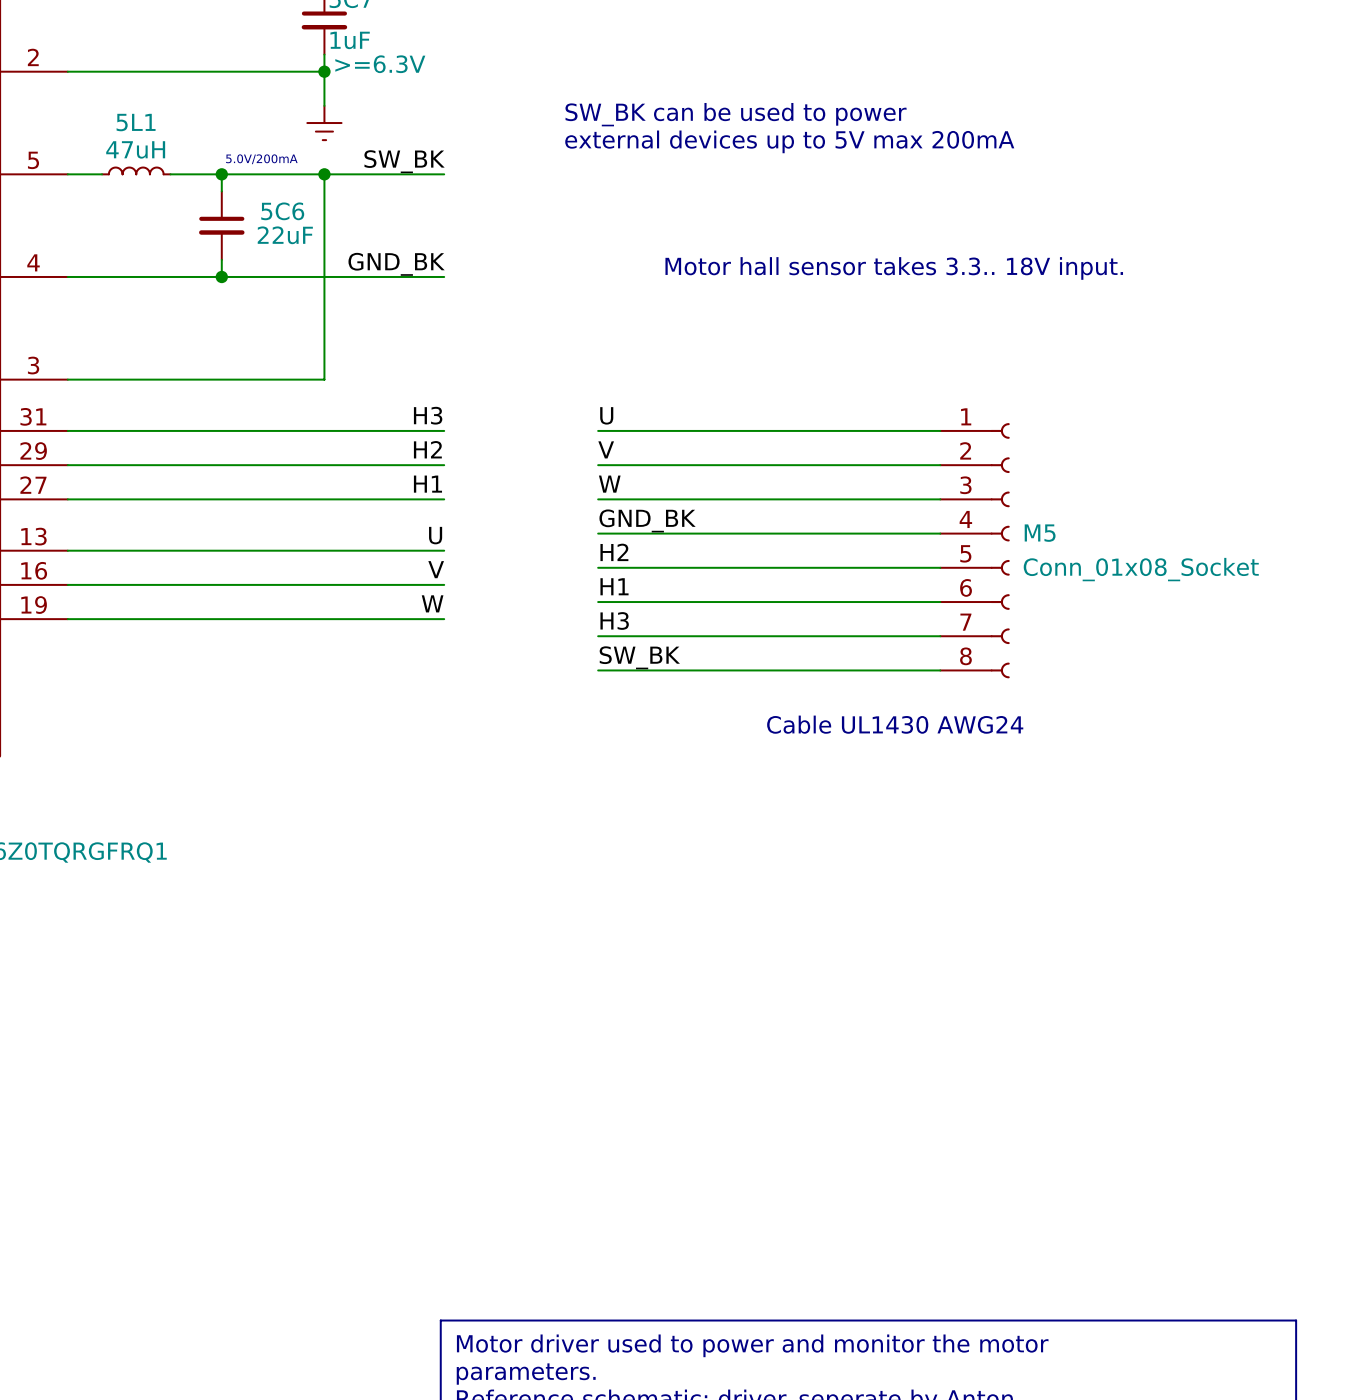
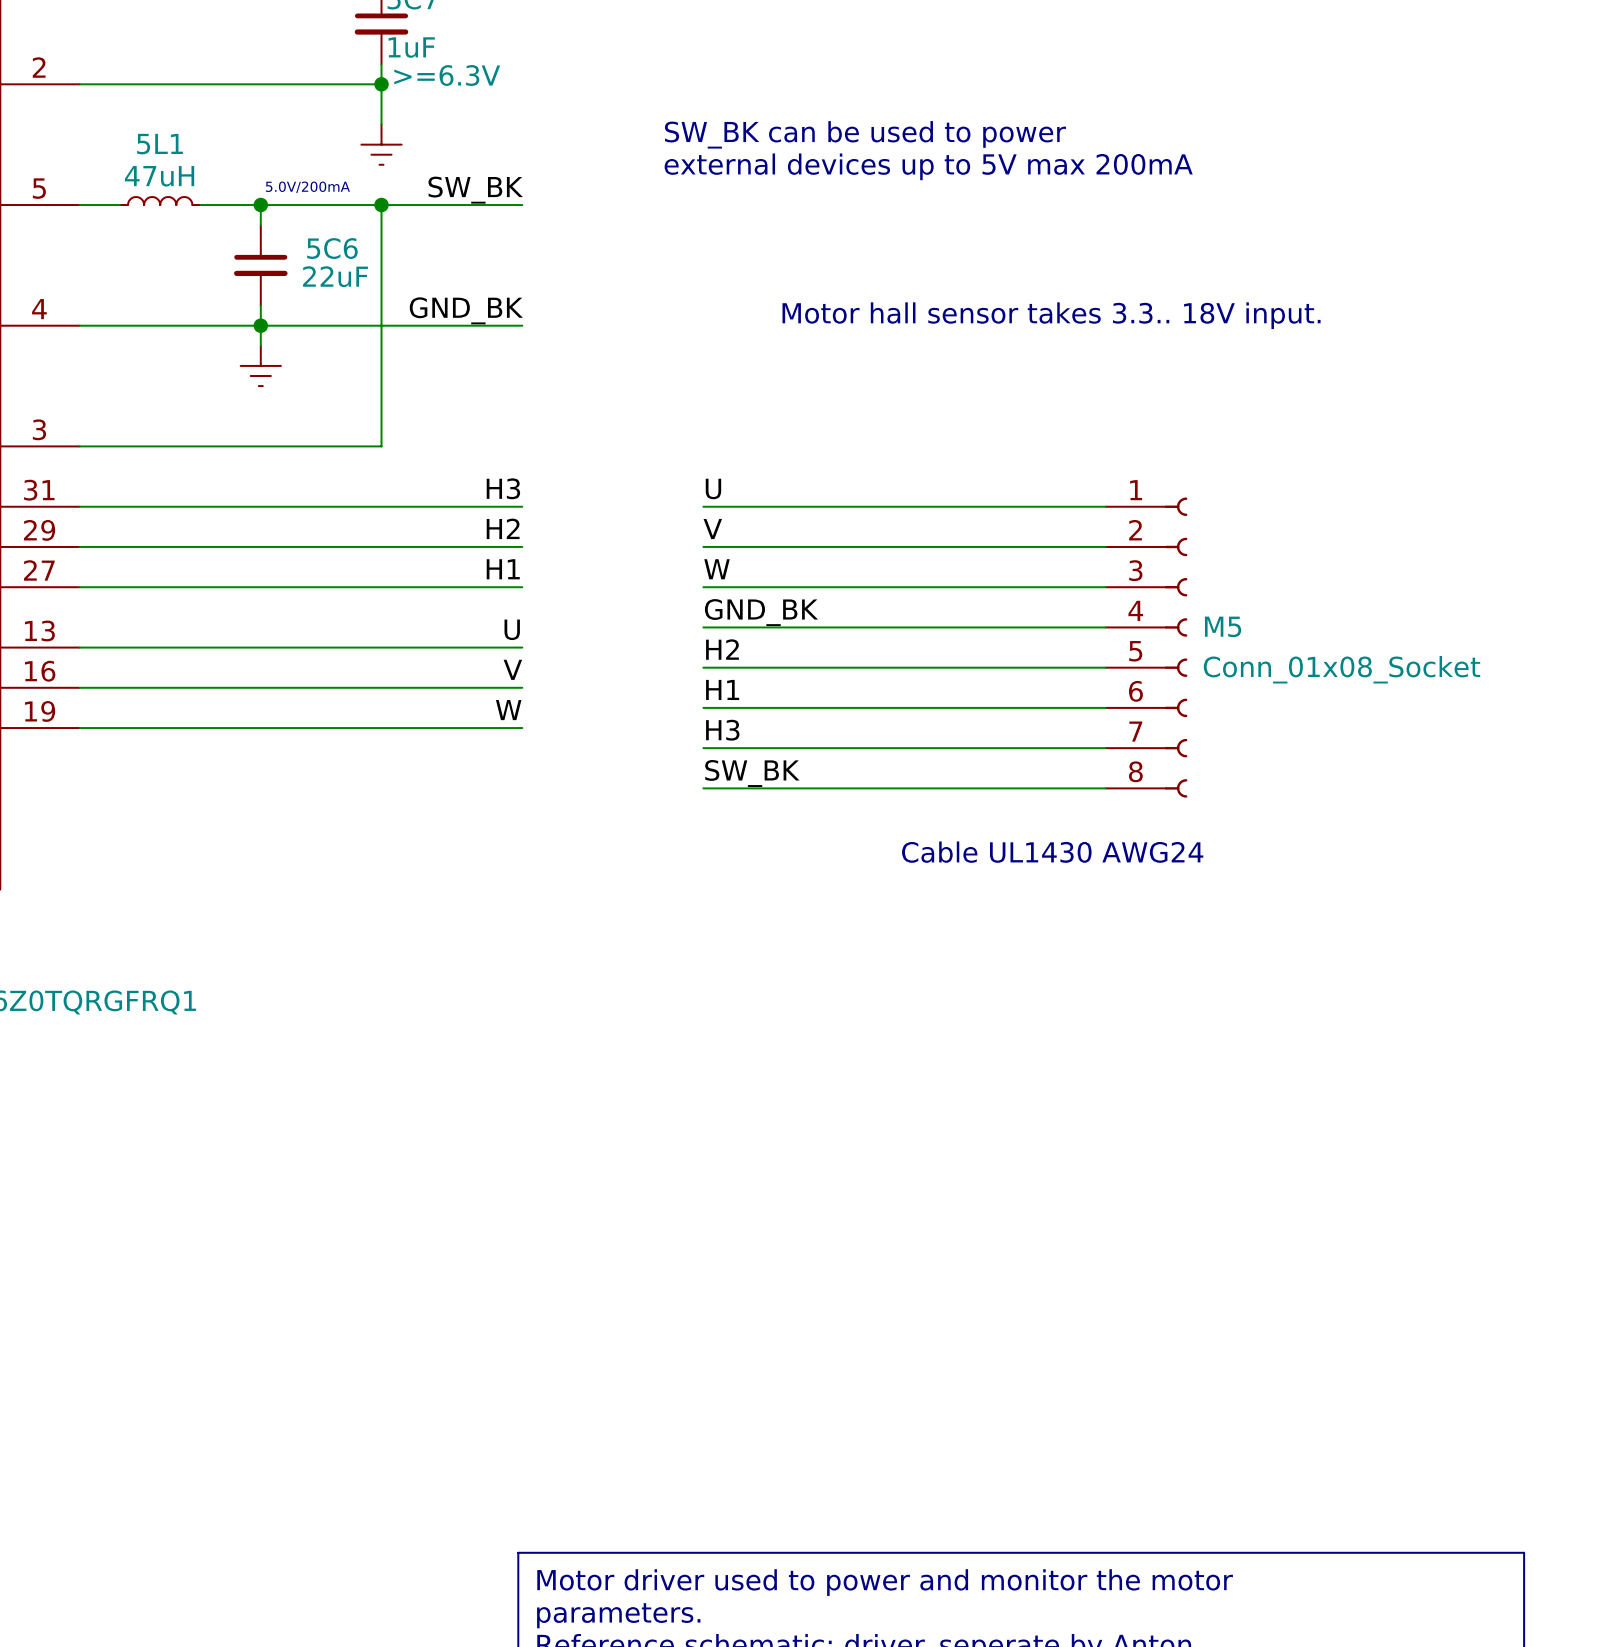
wire: none -> (260, 325) (260, 345)
power symbol: none -> (260, 365)

